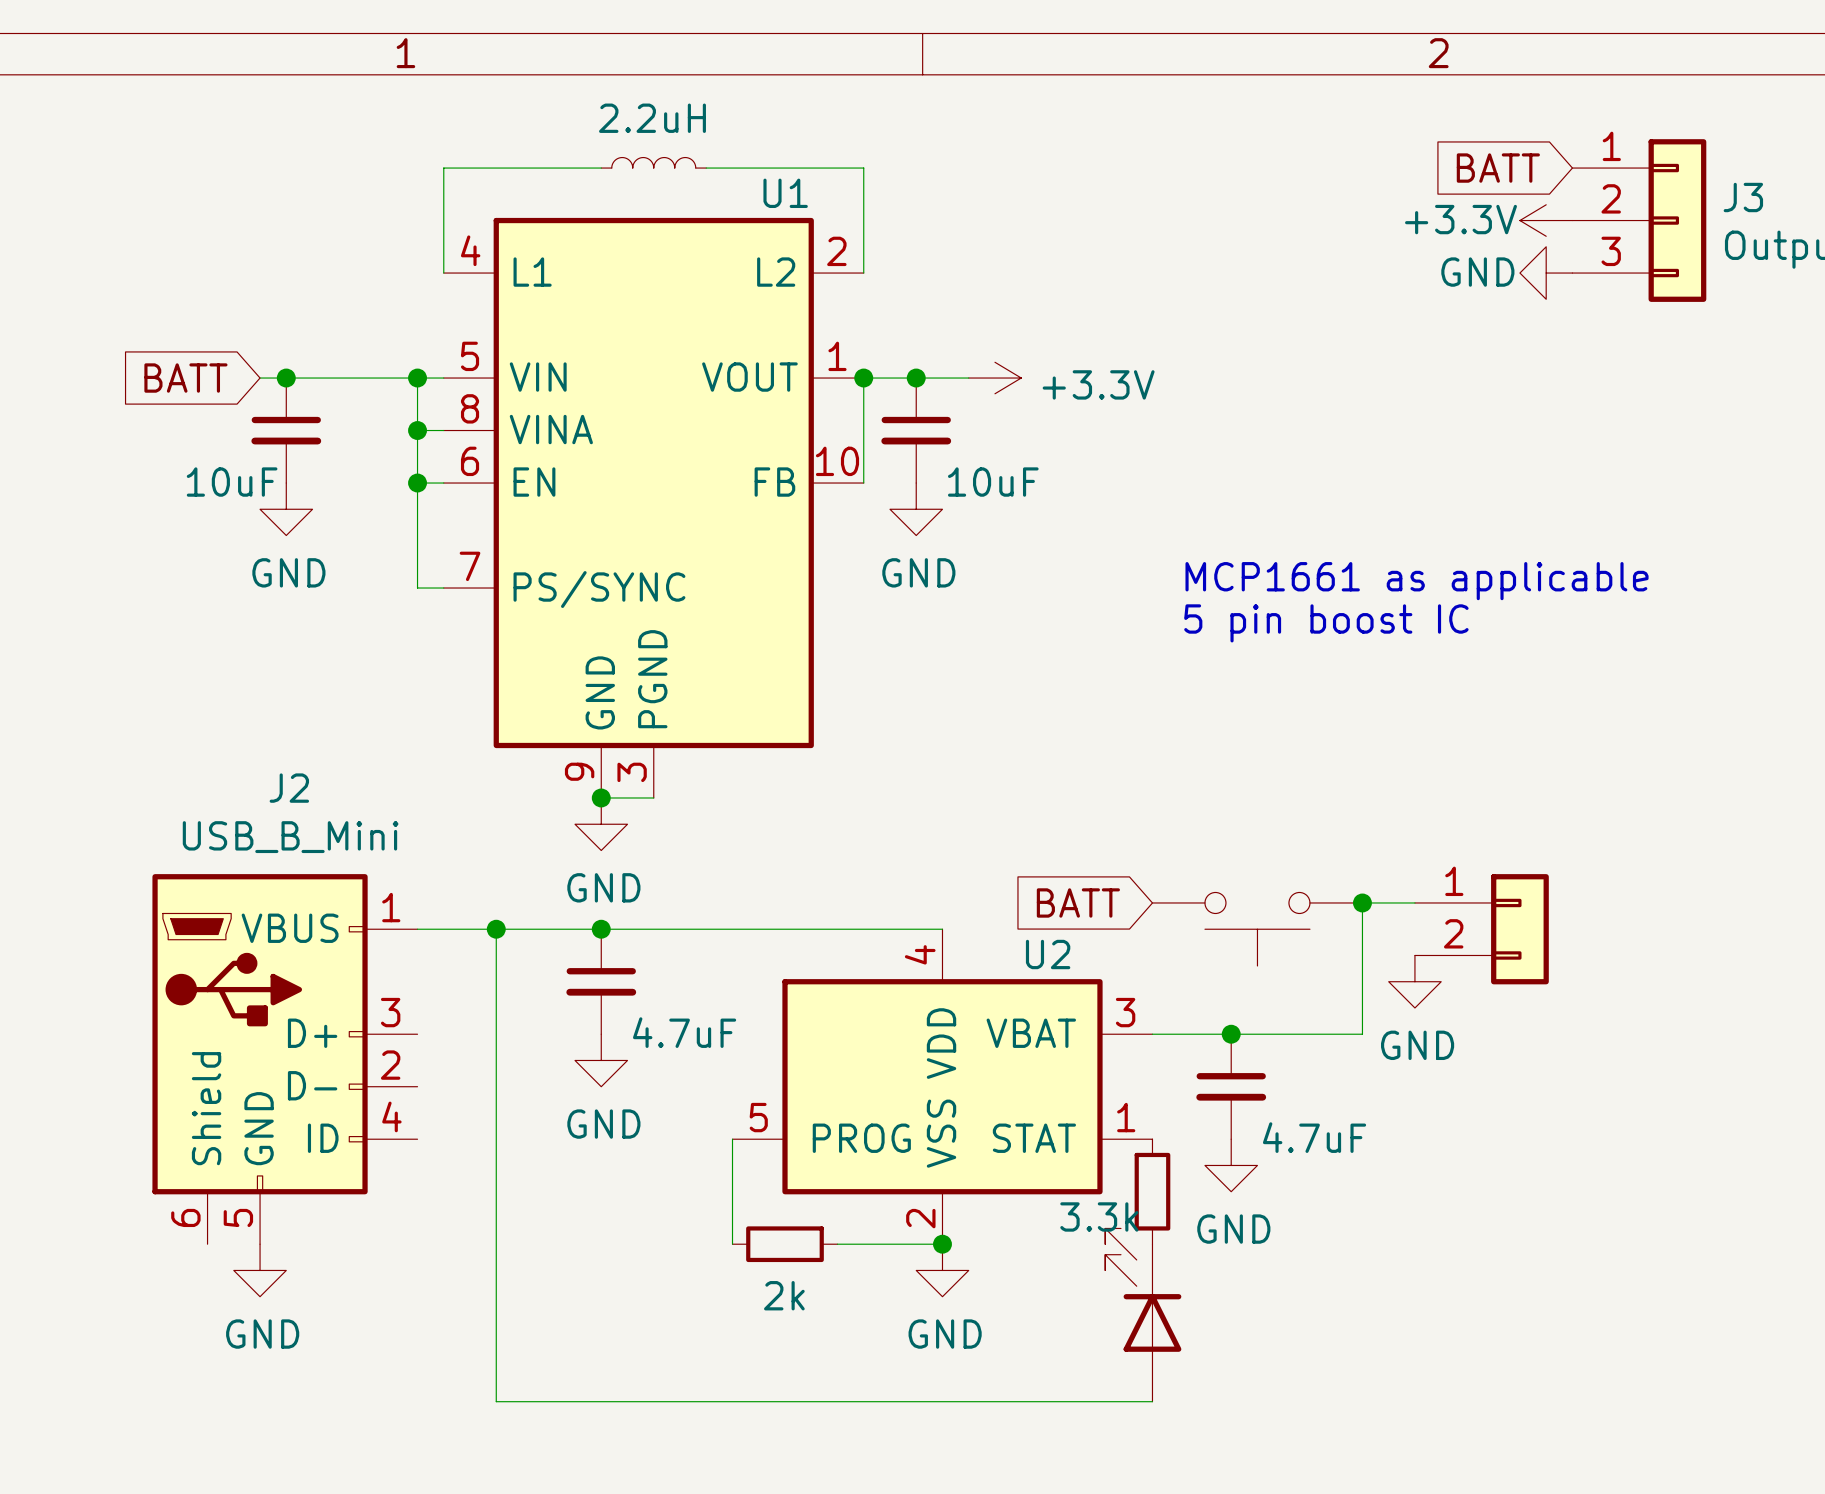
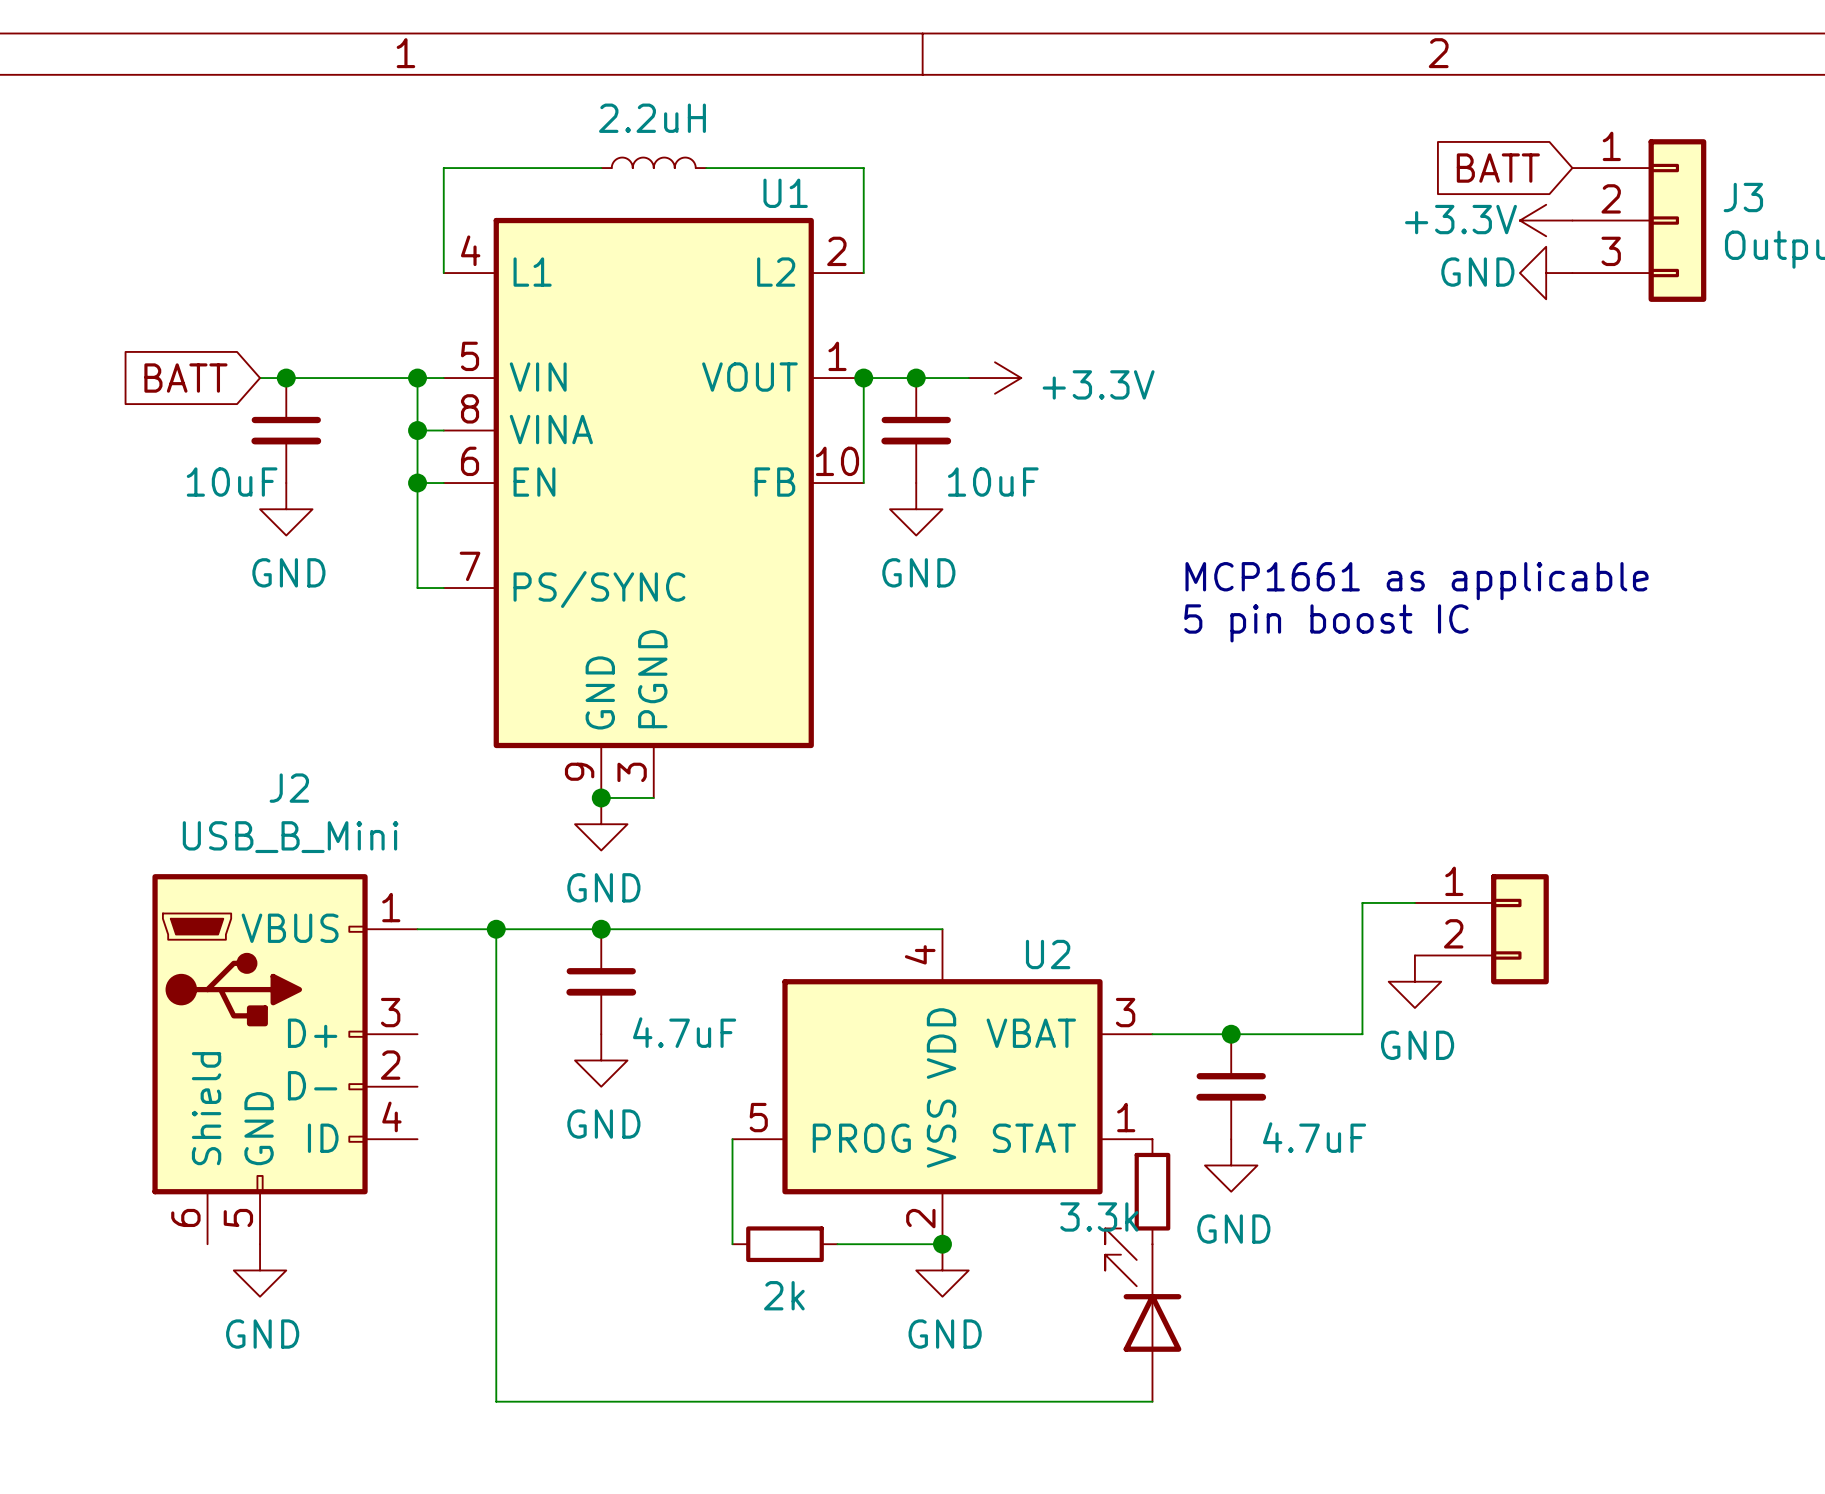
global label: BATT (1078, 902) -> none
junction: (1362, 902) -> none
part: (1257, 929) -> none

